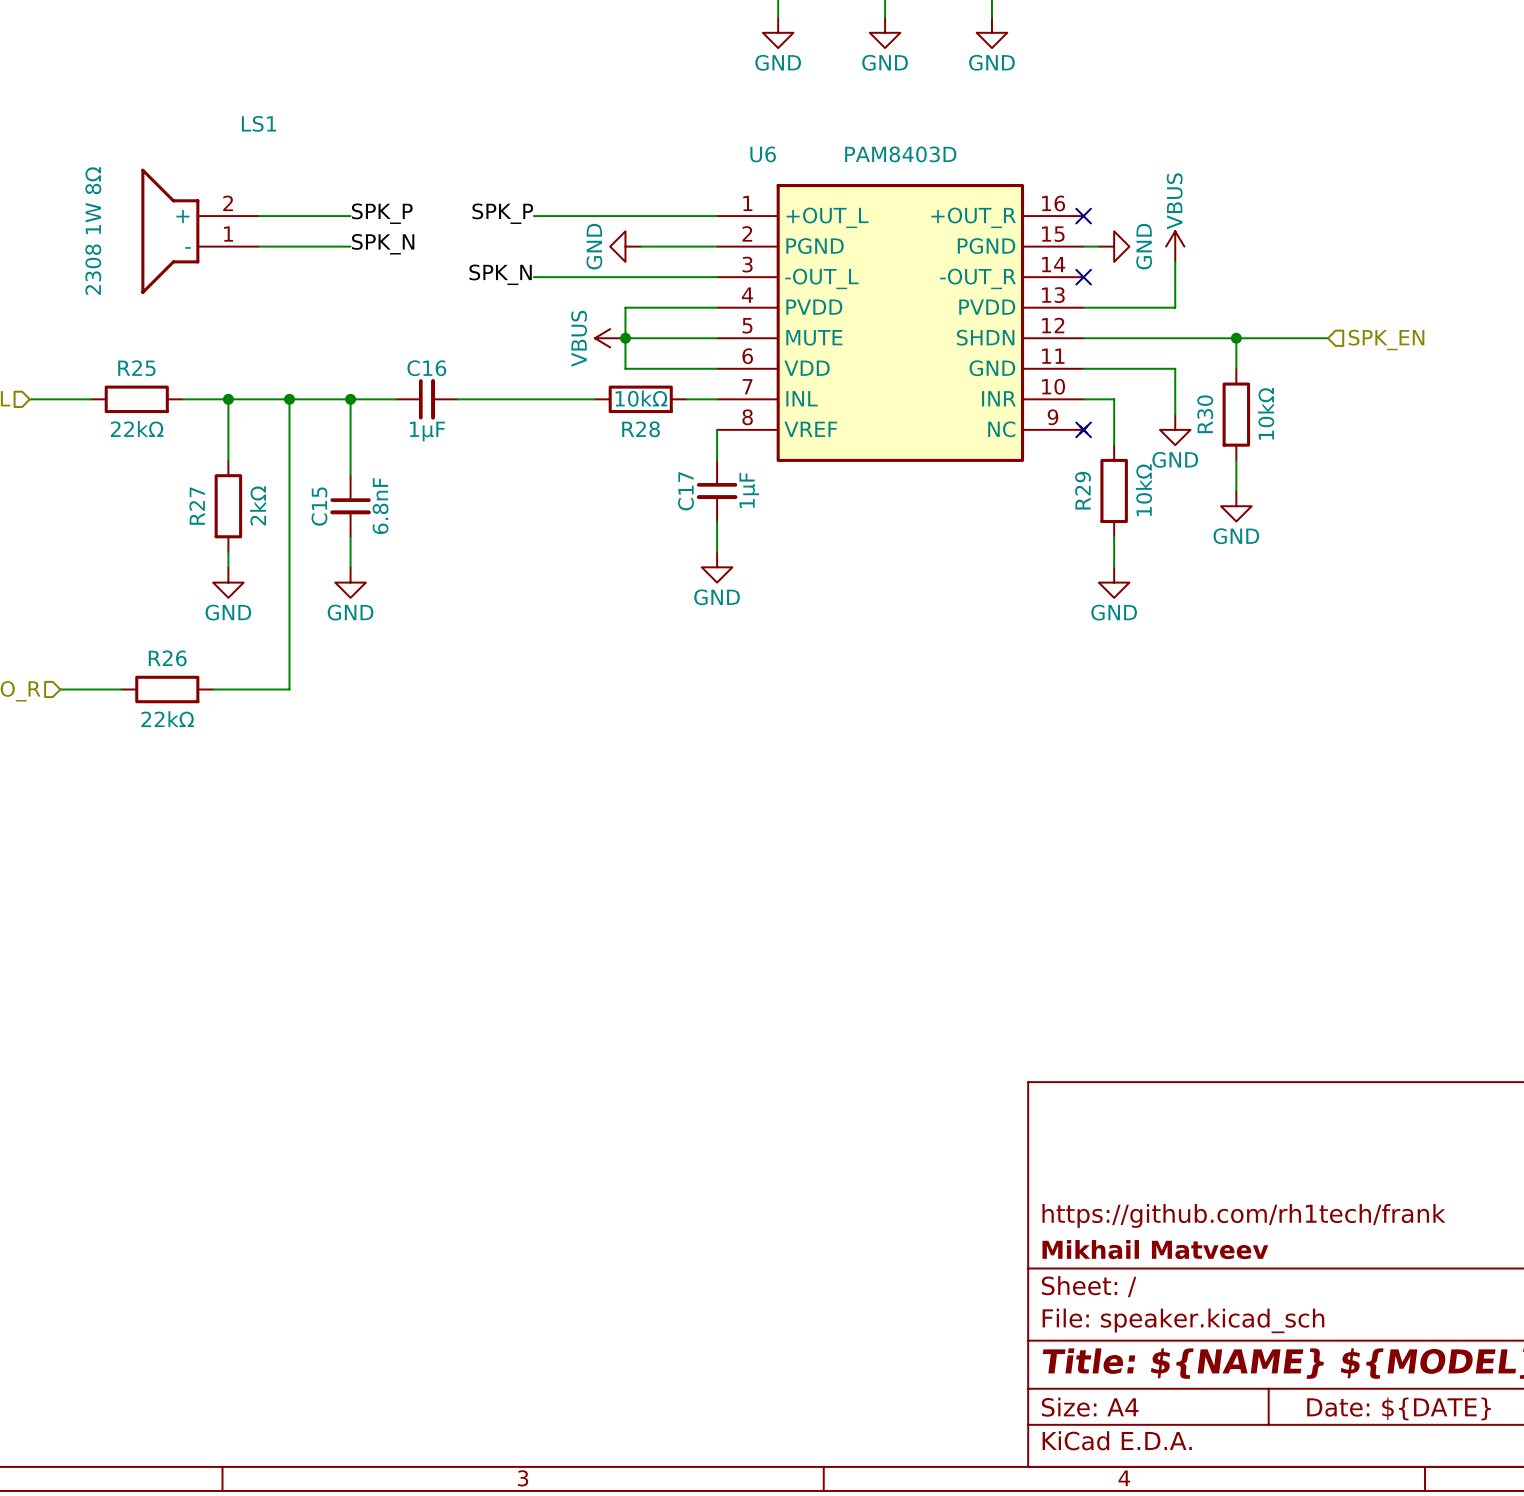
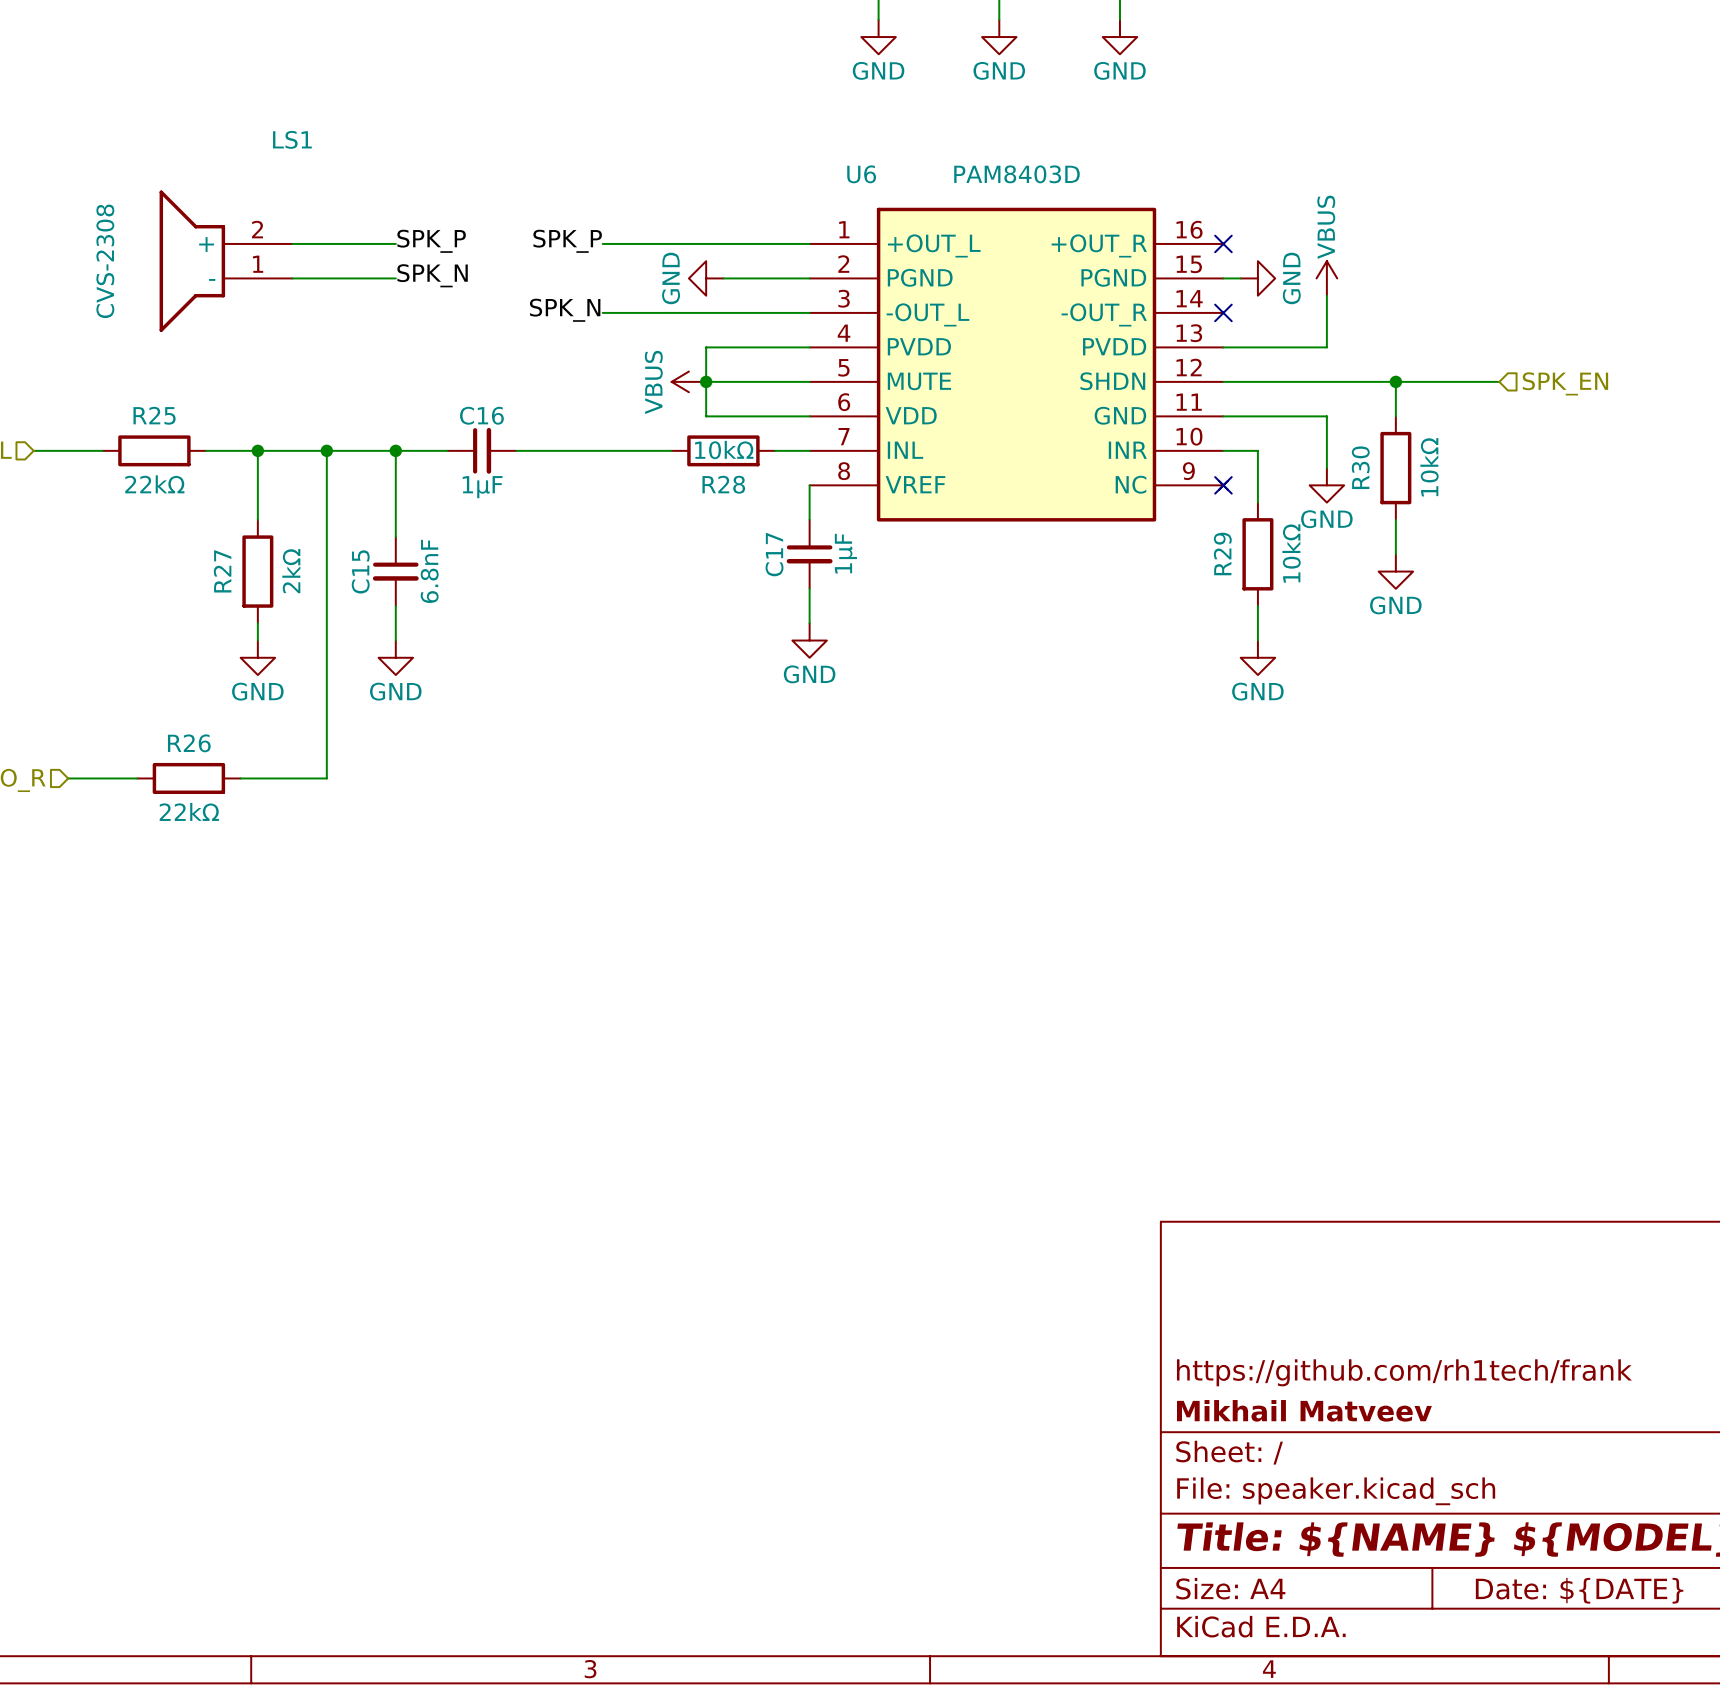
LS1 value: 2308 1W 8Ω (93, 230) -> CVS-2308 (105, 261)

